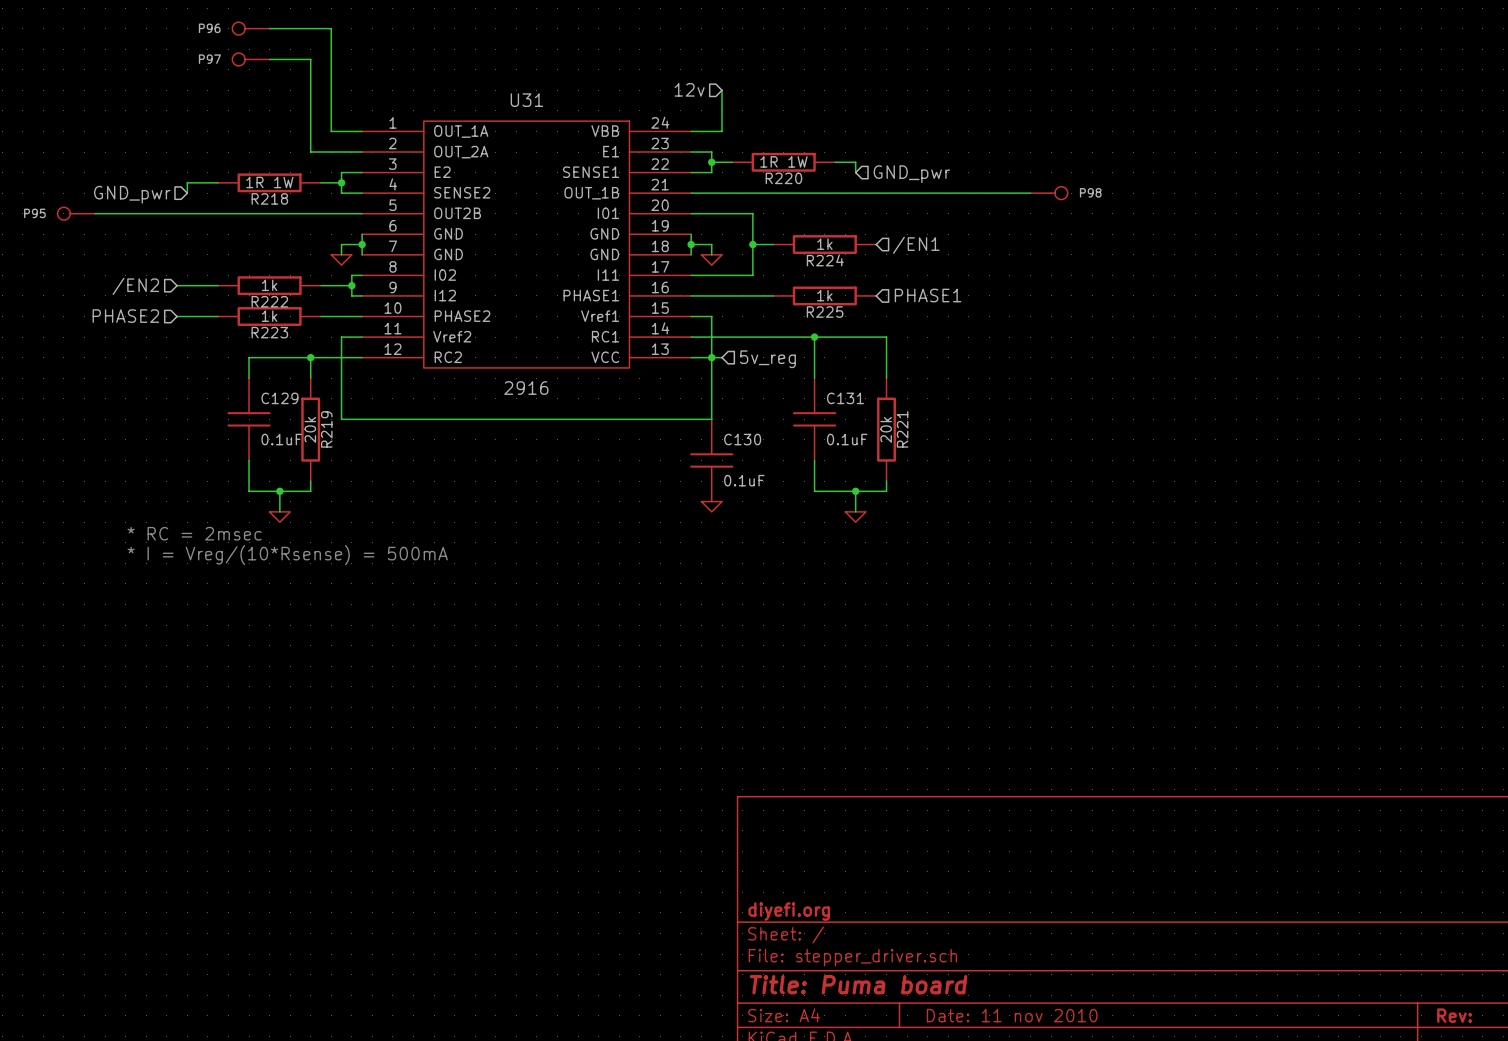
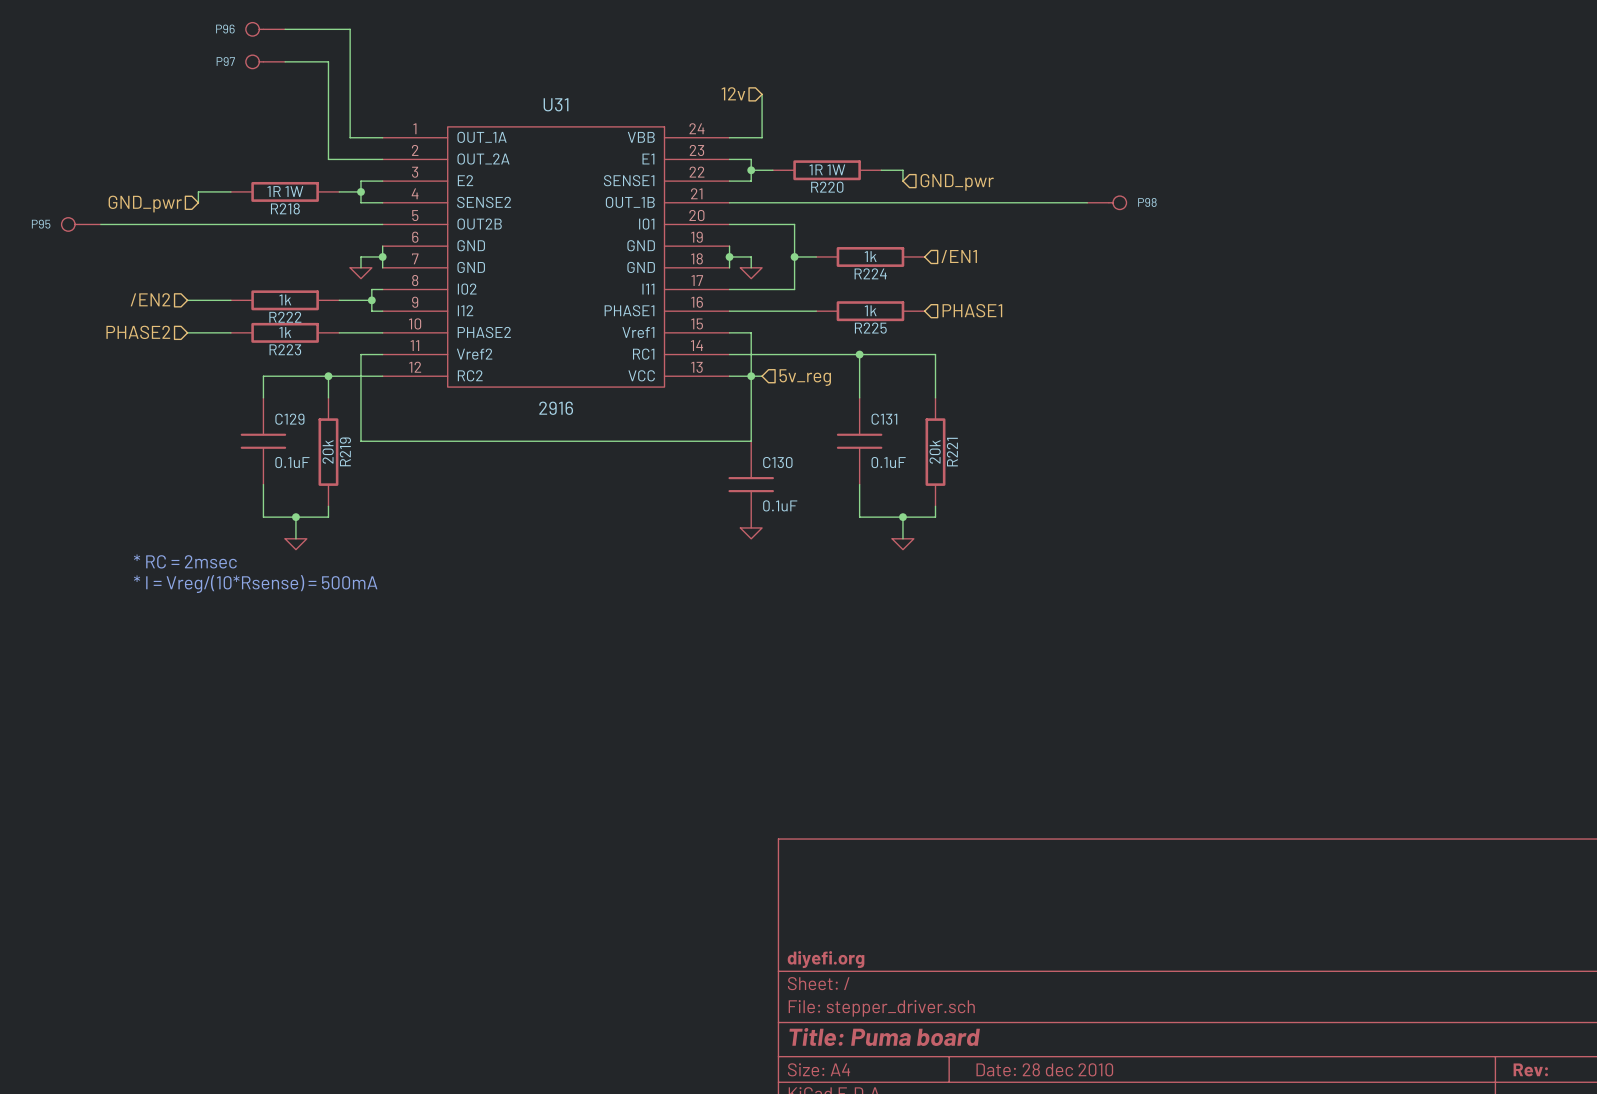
title block: Date: 11 nov 2010 (1012, 1015) -> Date: 28 dec 2010 (1044, 1069)

